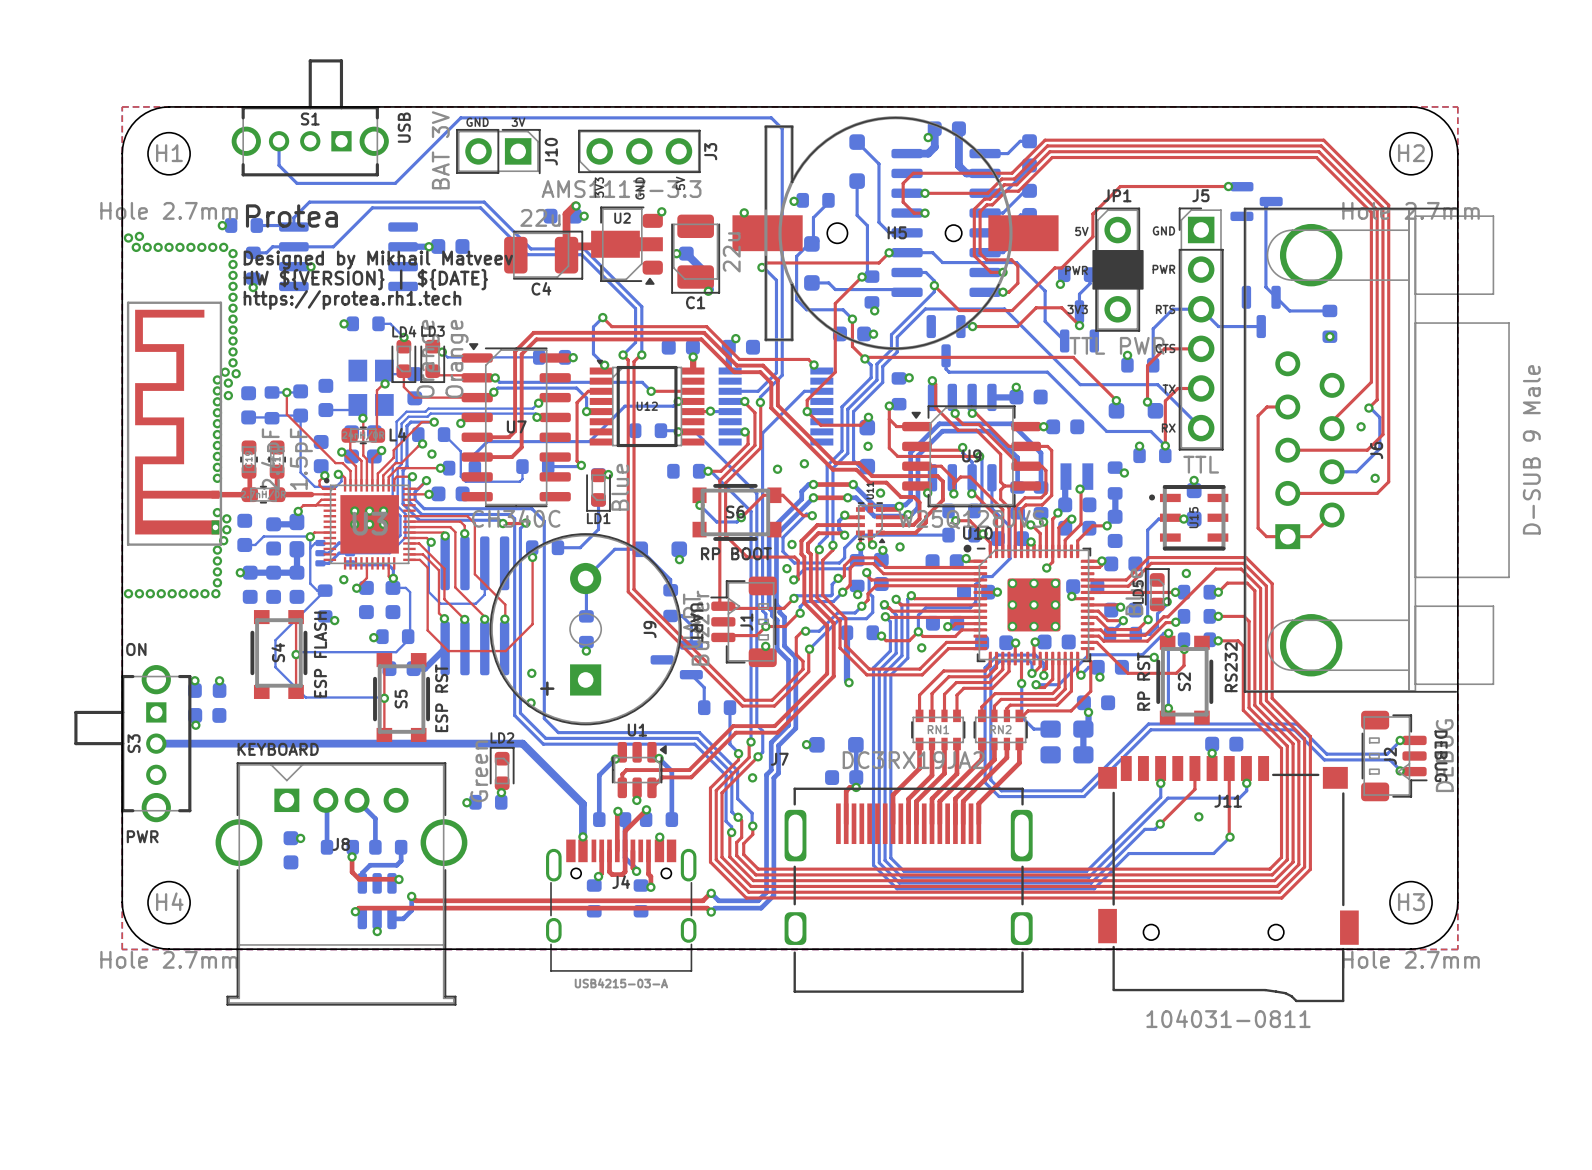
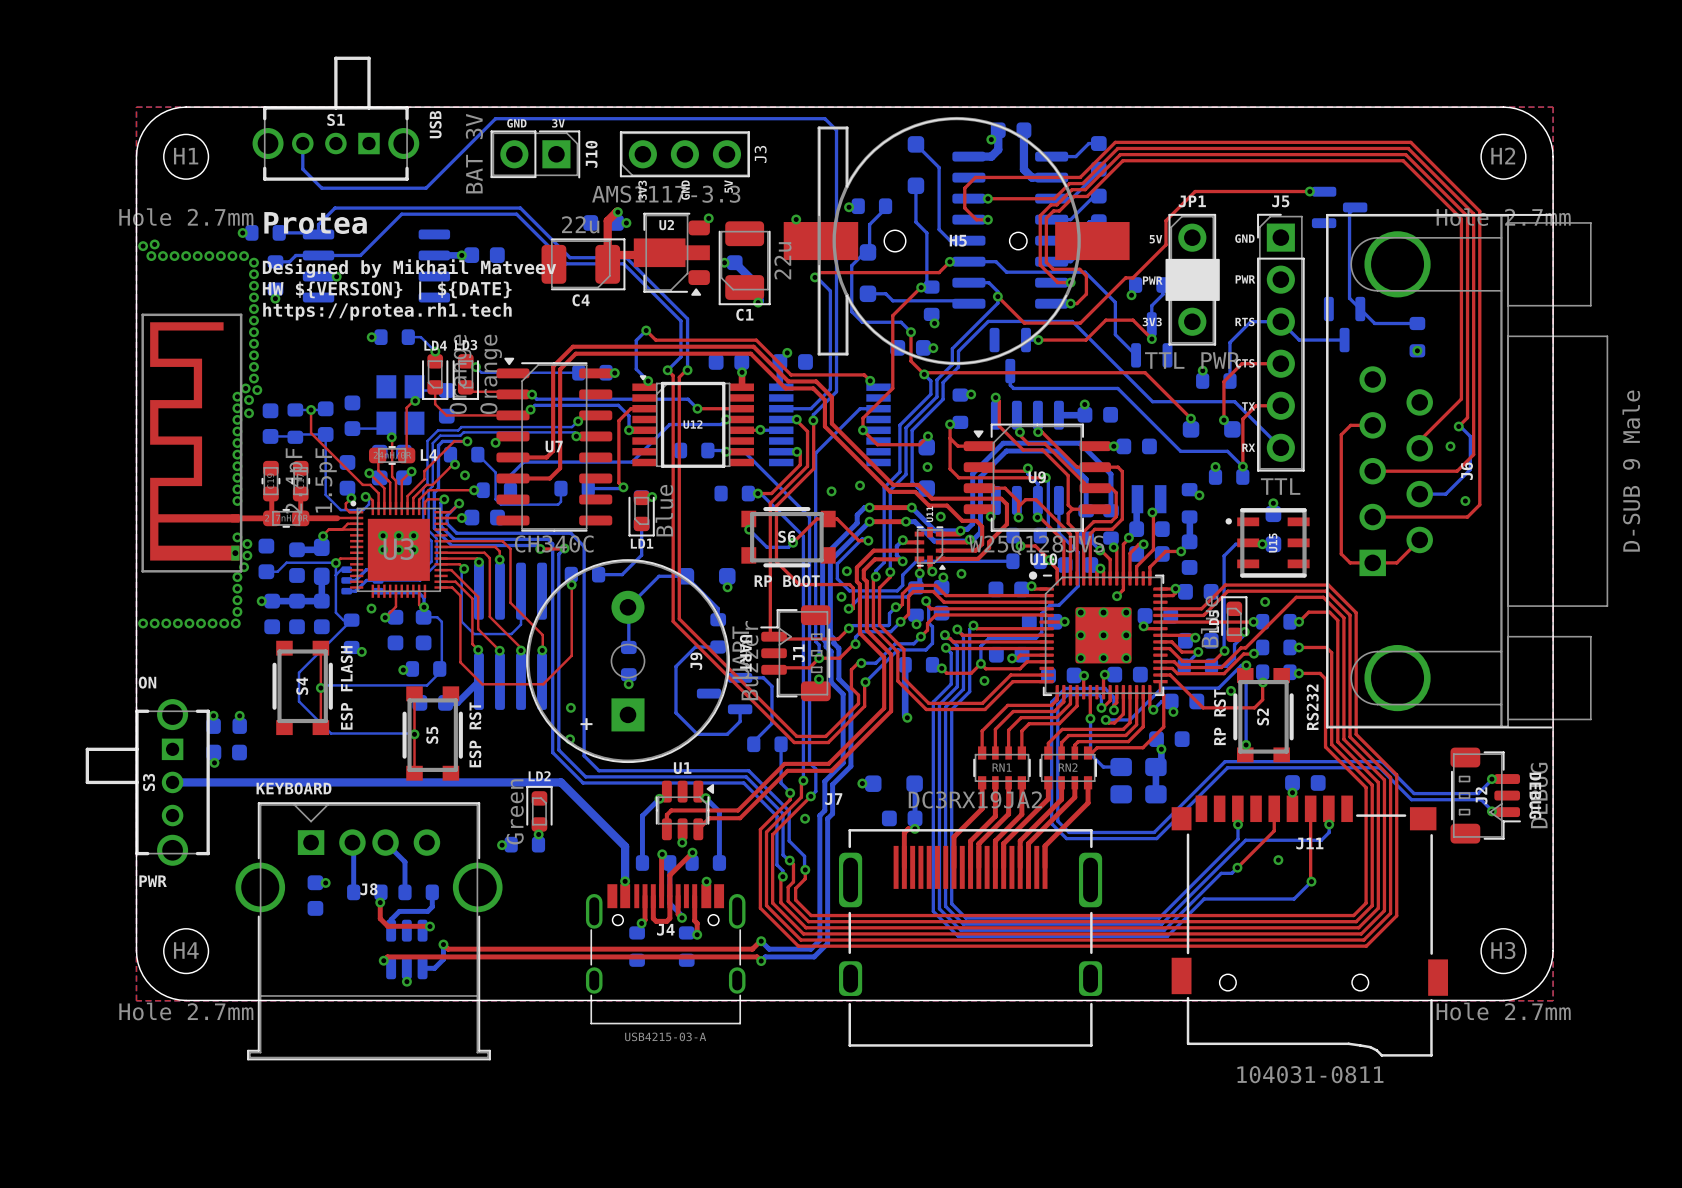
bottom track: (670, 615) (681, 615) (691, 625) (691, 645) -> (718, 647) (695, 647) (675, 666) (675, 712) (697, 734) (727, 734) (740, 721) (740, 709)
bottom track: (691, 674) (704, 687) (704, 705) -> (740, 677) (763, 677) (771, 686) (771, 723) (753, 741)

